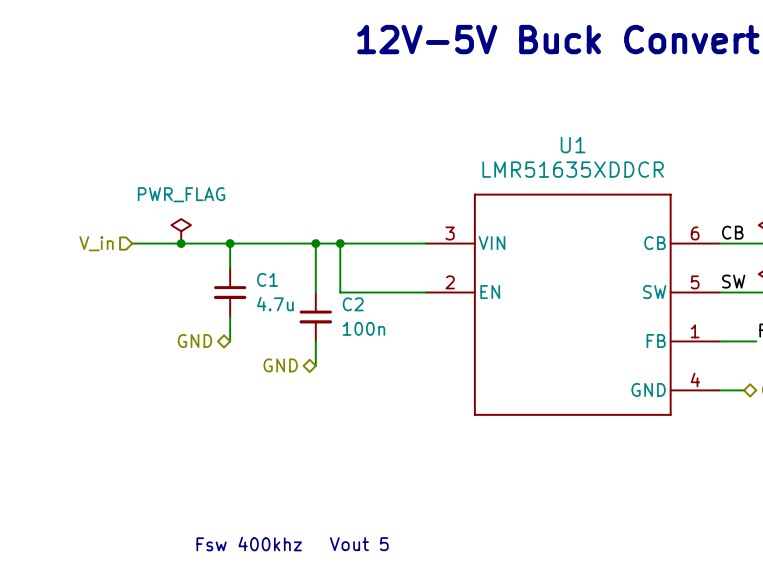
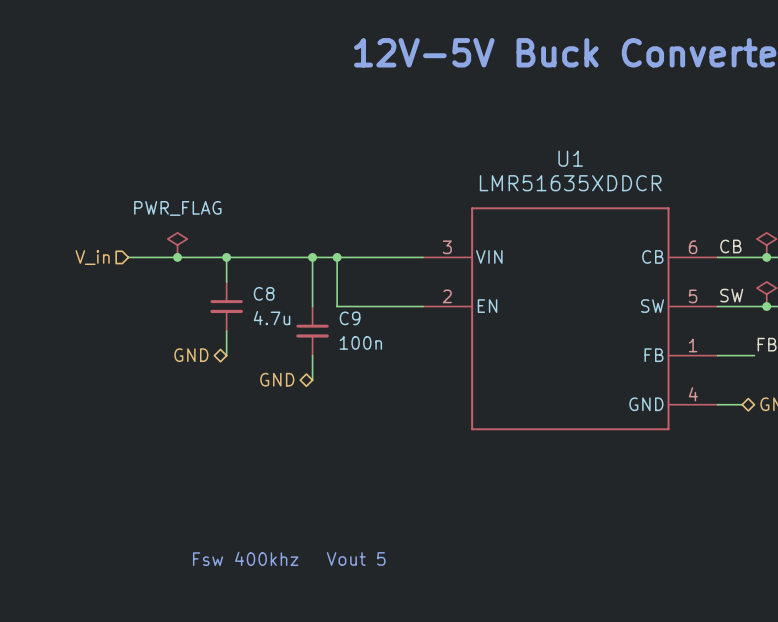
C1 name: C1 (267, 279) -> C8 (264, 293)
C2 name: C2 (353, 304) -> C9 (350, 318)

